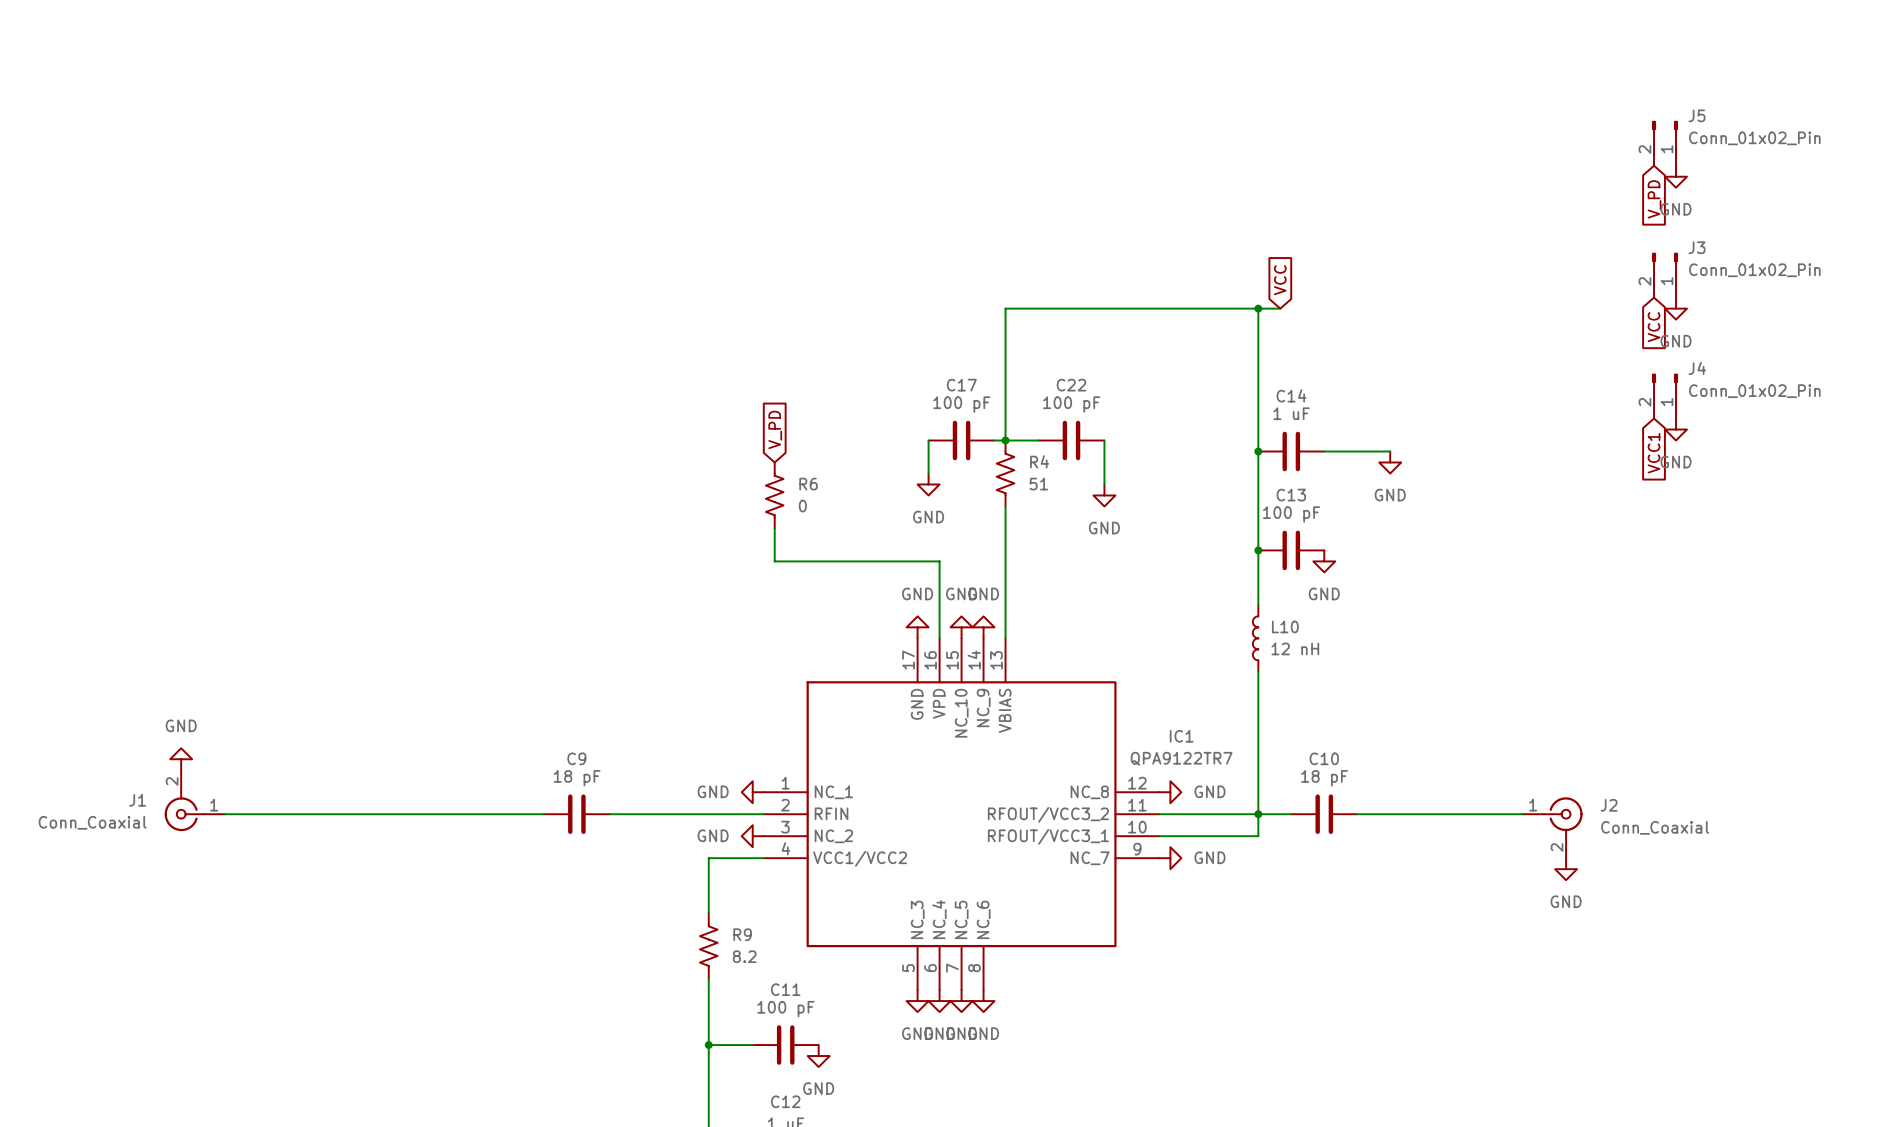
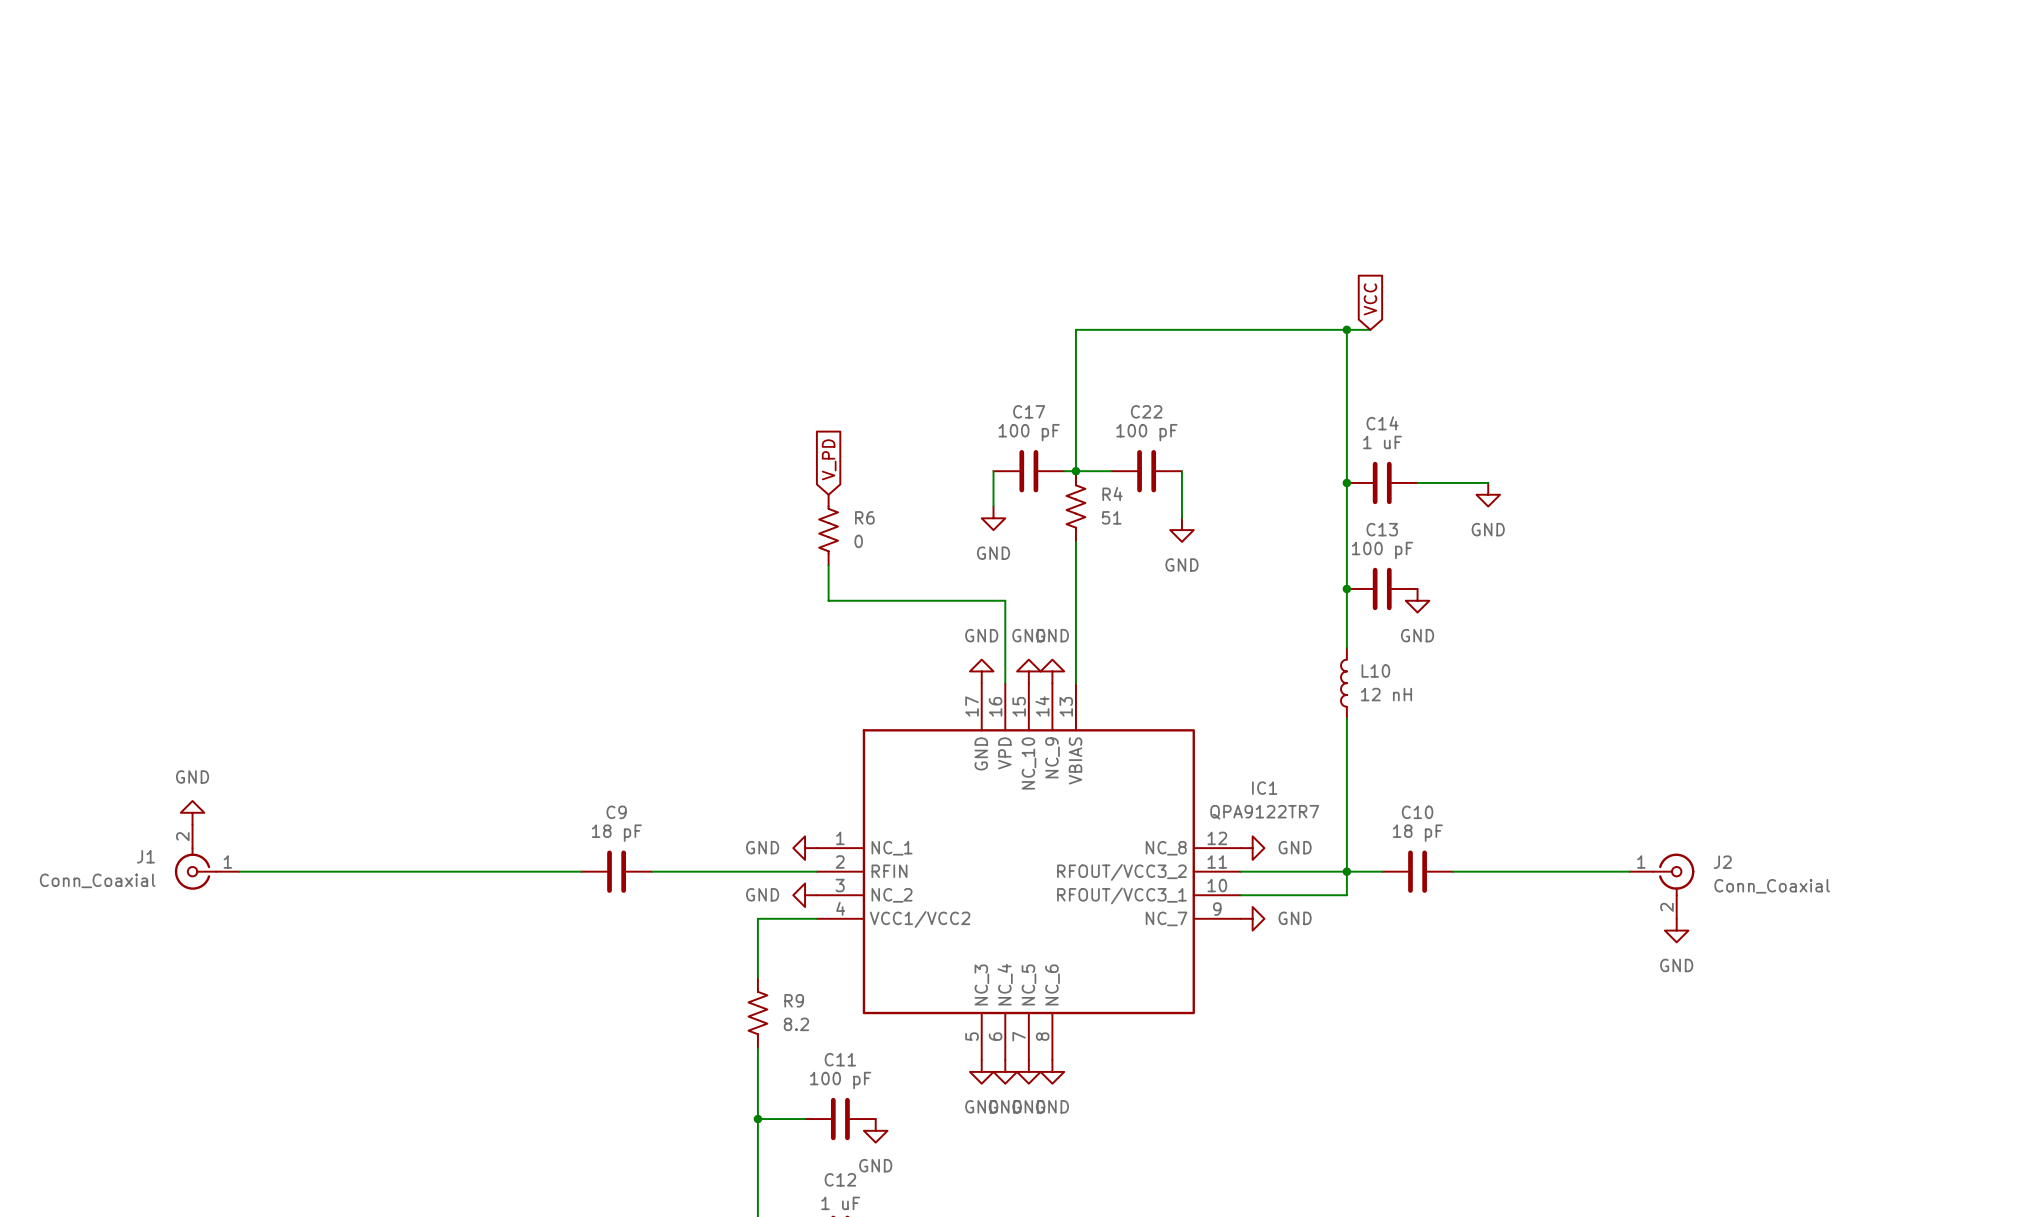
J5: Conn_01x02_Pin (1665, 143) -> none
power symbol: GND (1675, 176) -> none
global label: V_PD (1654, 199) -> none
J3: Conn_01x02_Pin (1665, 275) -> none
power symbol: GND (1675, 308) -> none
global label: VCC (1654, 327) -> none
J4: Conn_01x02_Pin (1665, 396) -> none
power symbol: GND (1675, 429) -> none
global label: VCC1 (1654, 453) -> none

